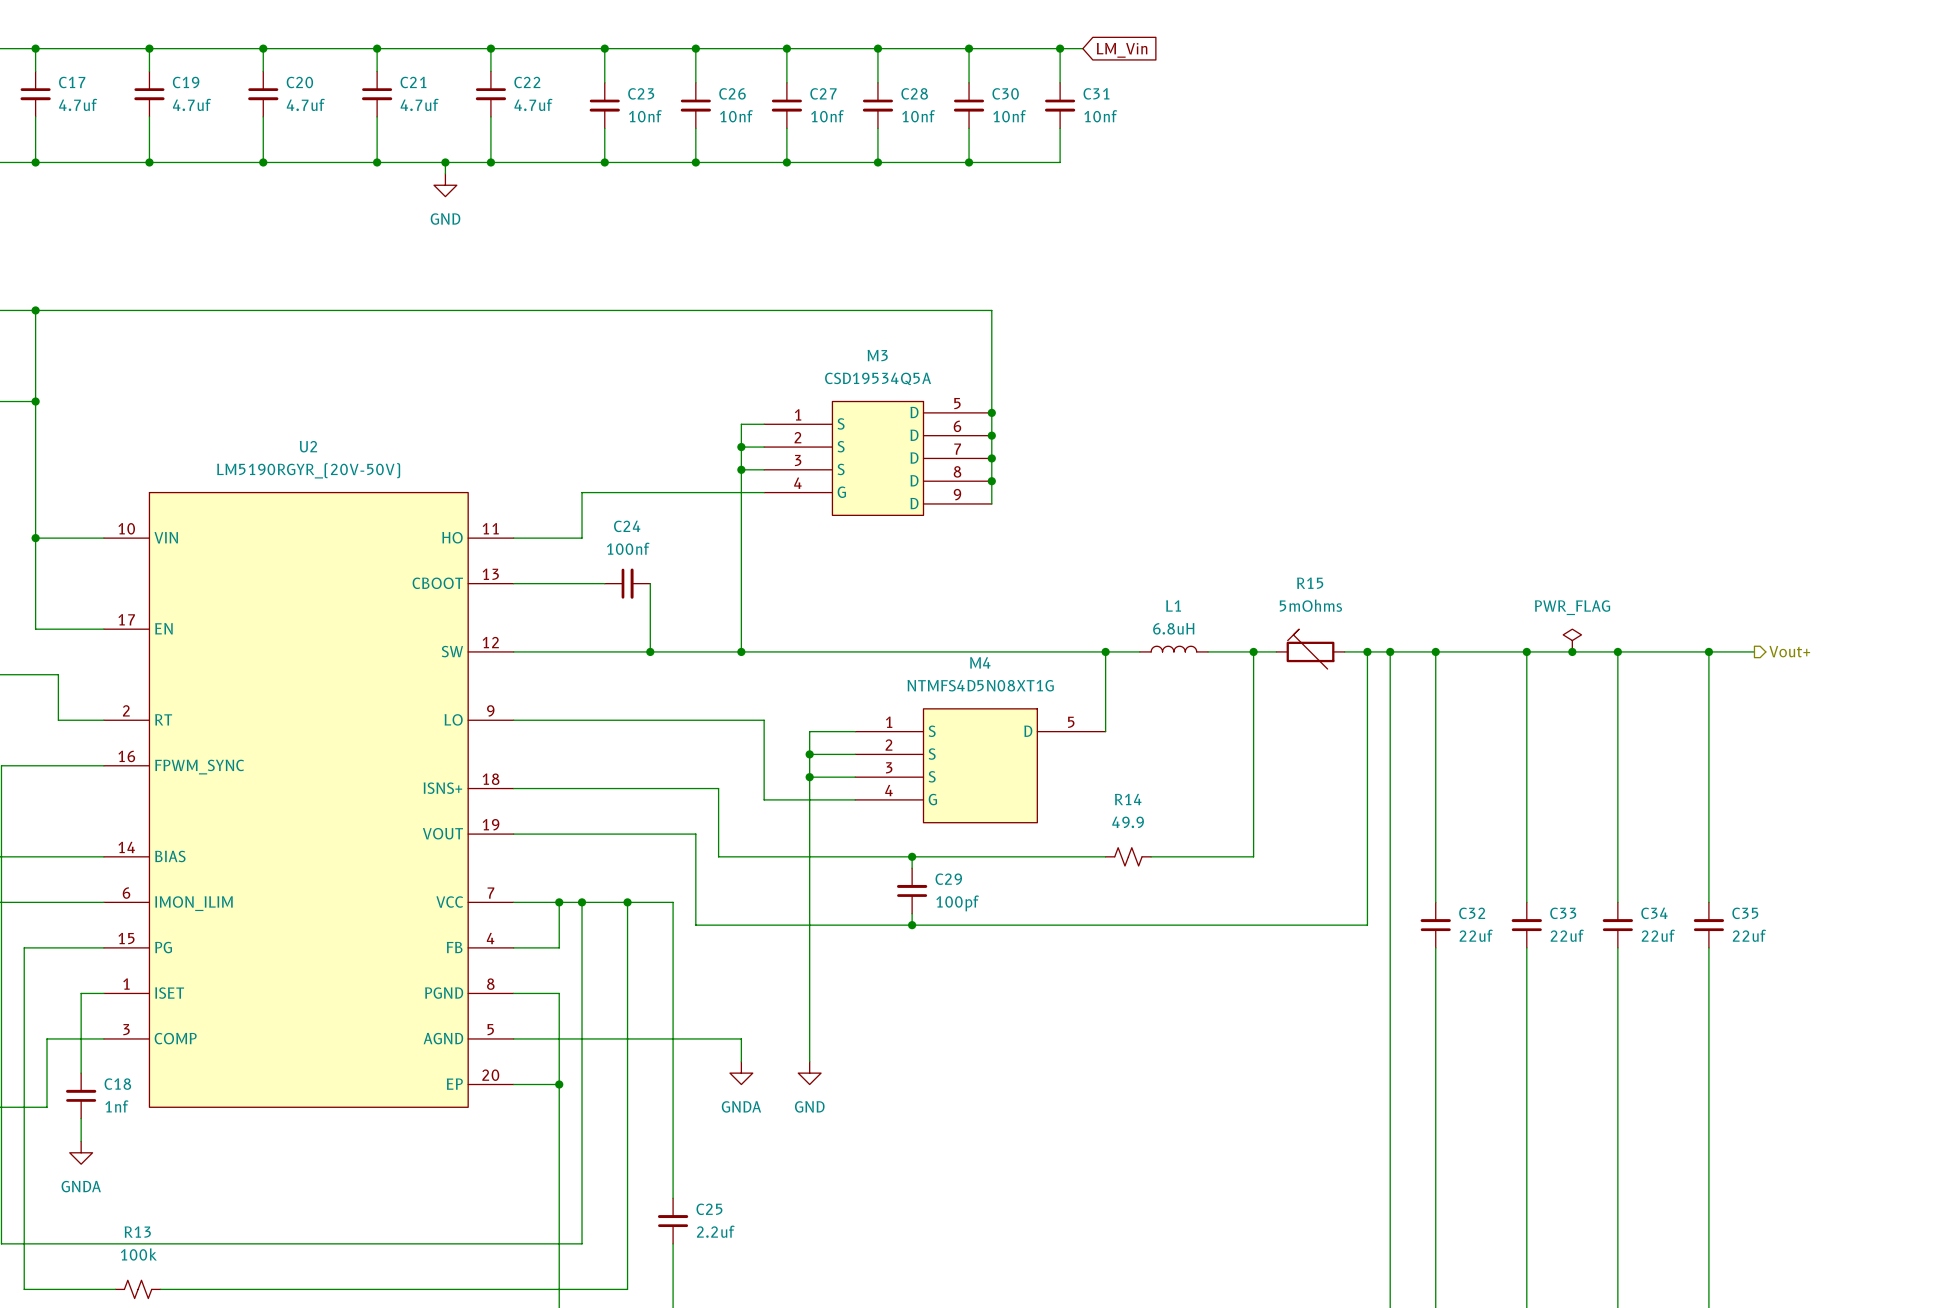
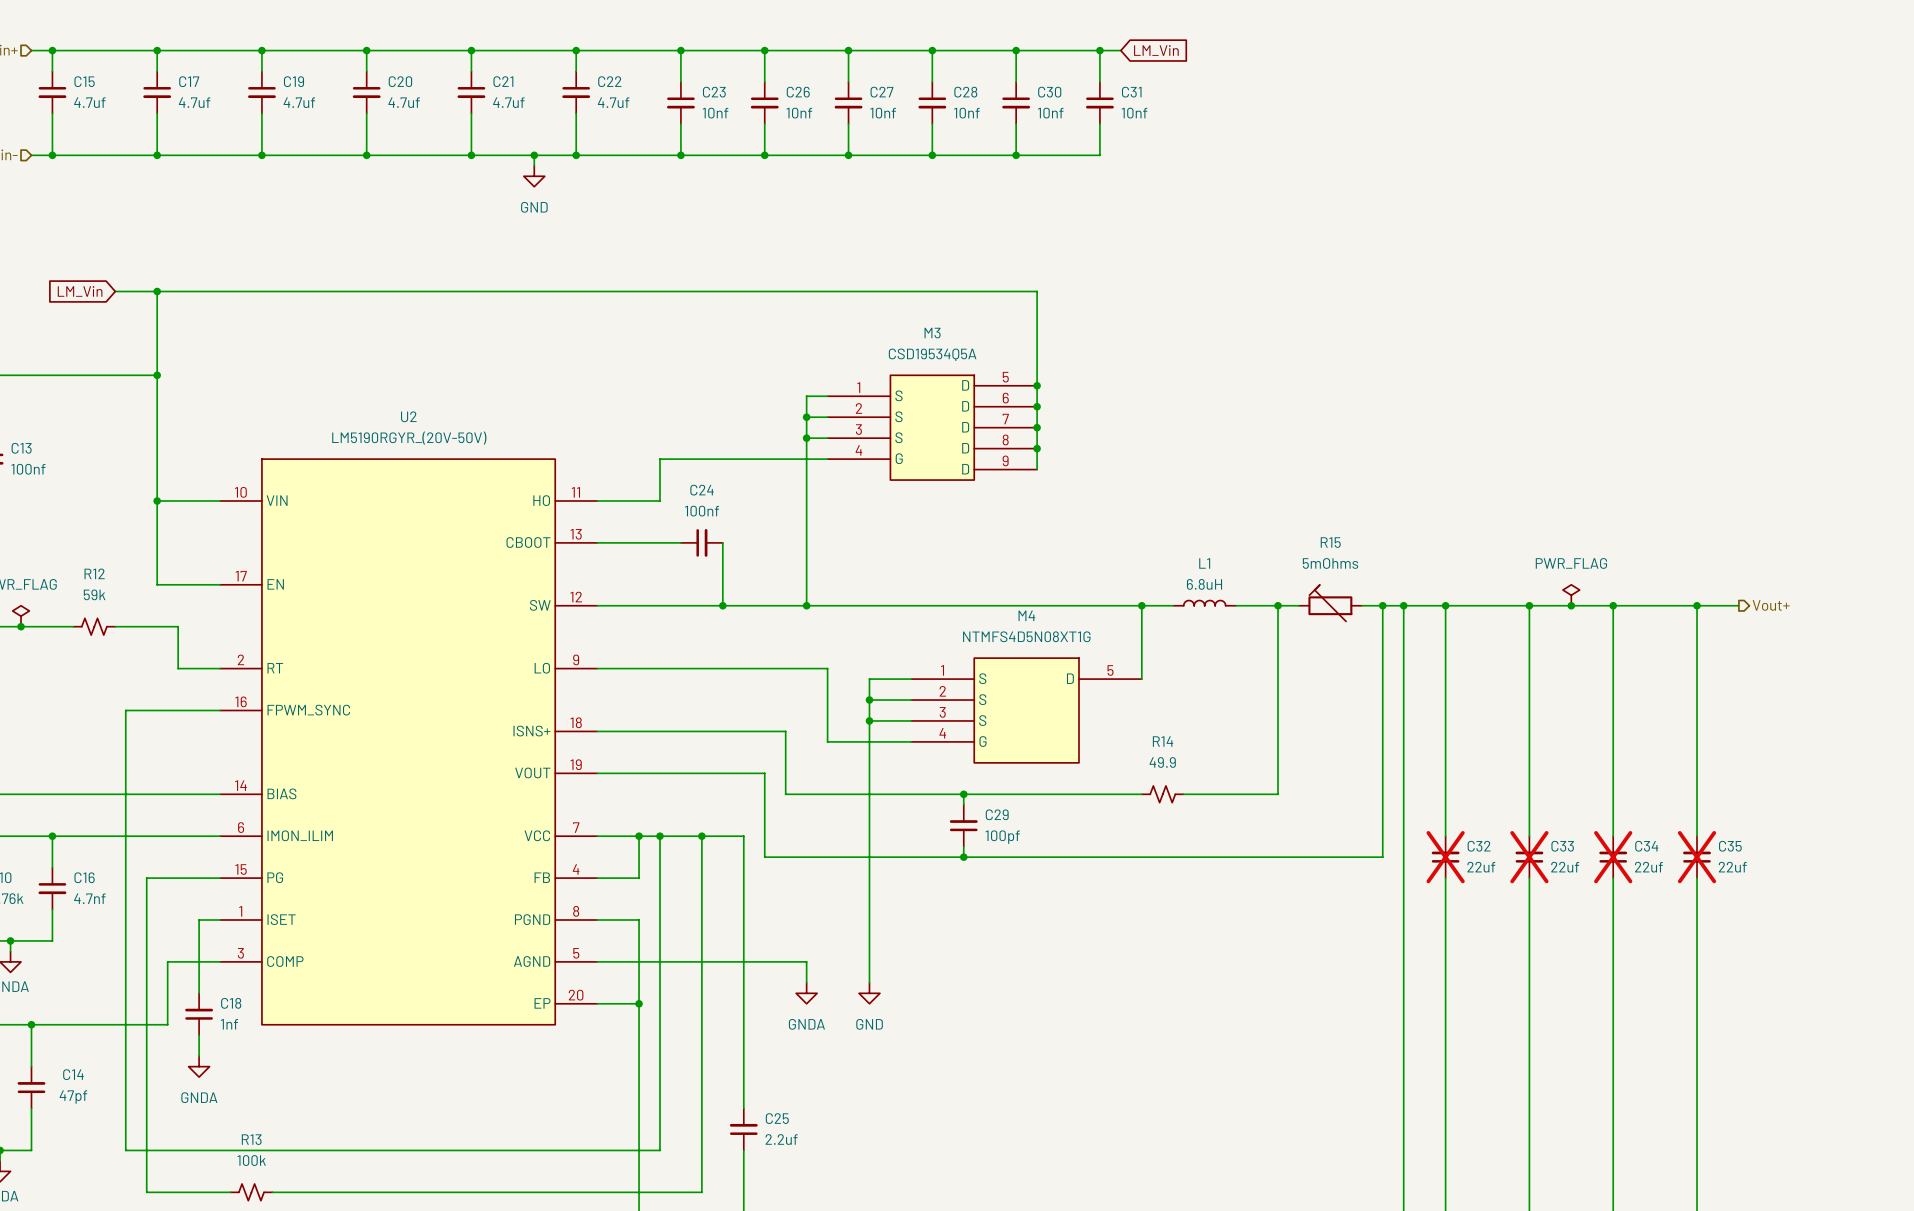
C32 do-not-place cross: none -> (1445, 857)
C33 do-not-place cross: none -> (1529, 857)
C34 do-not-place cross: none -> (1613, 857)
C35 do-not-place cross: none -> (1697, 857)

